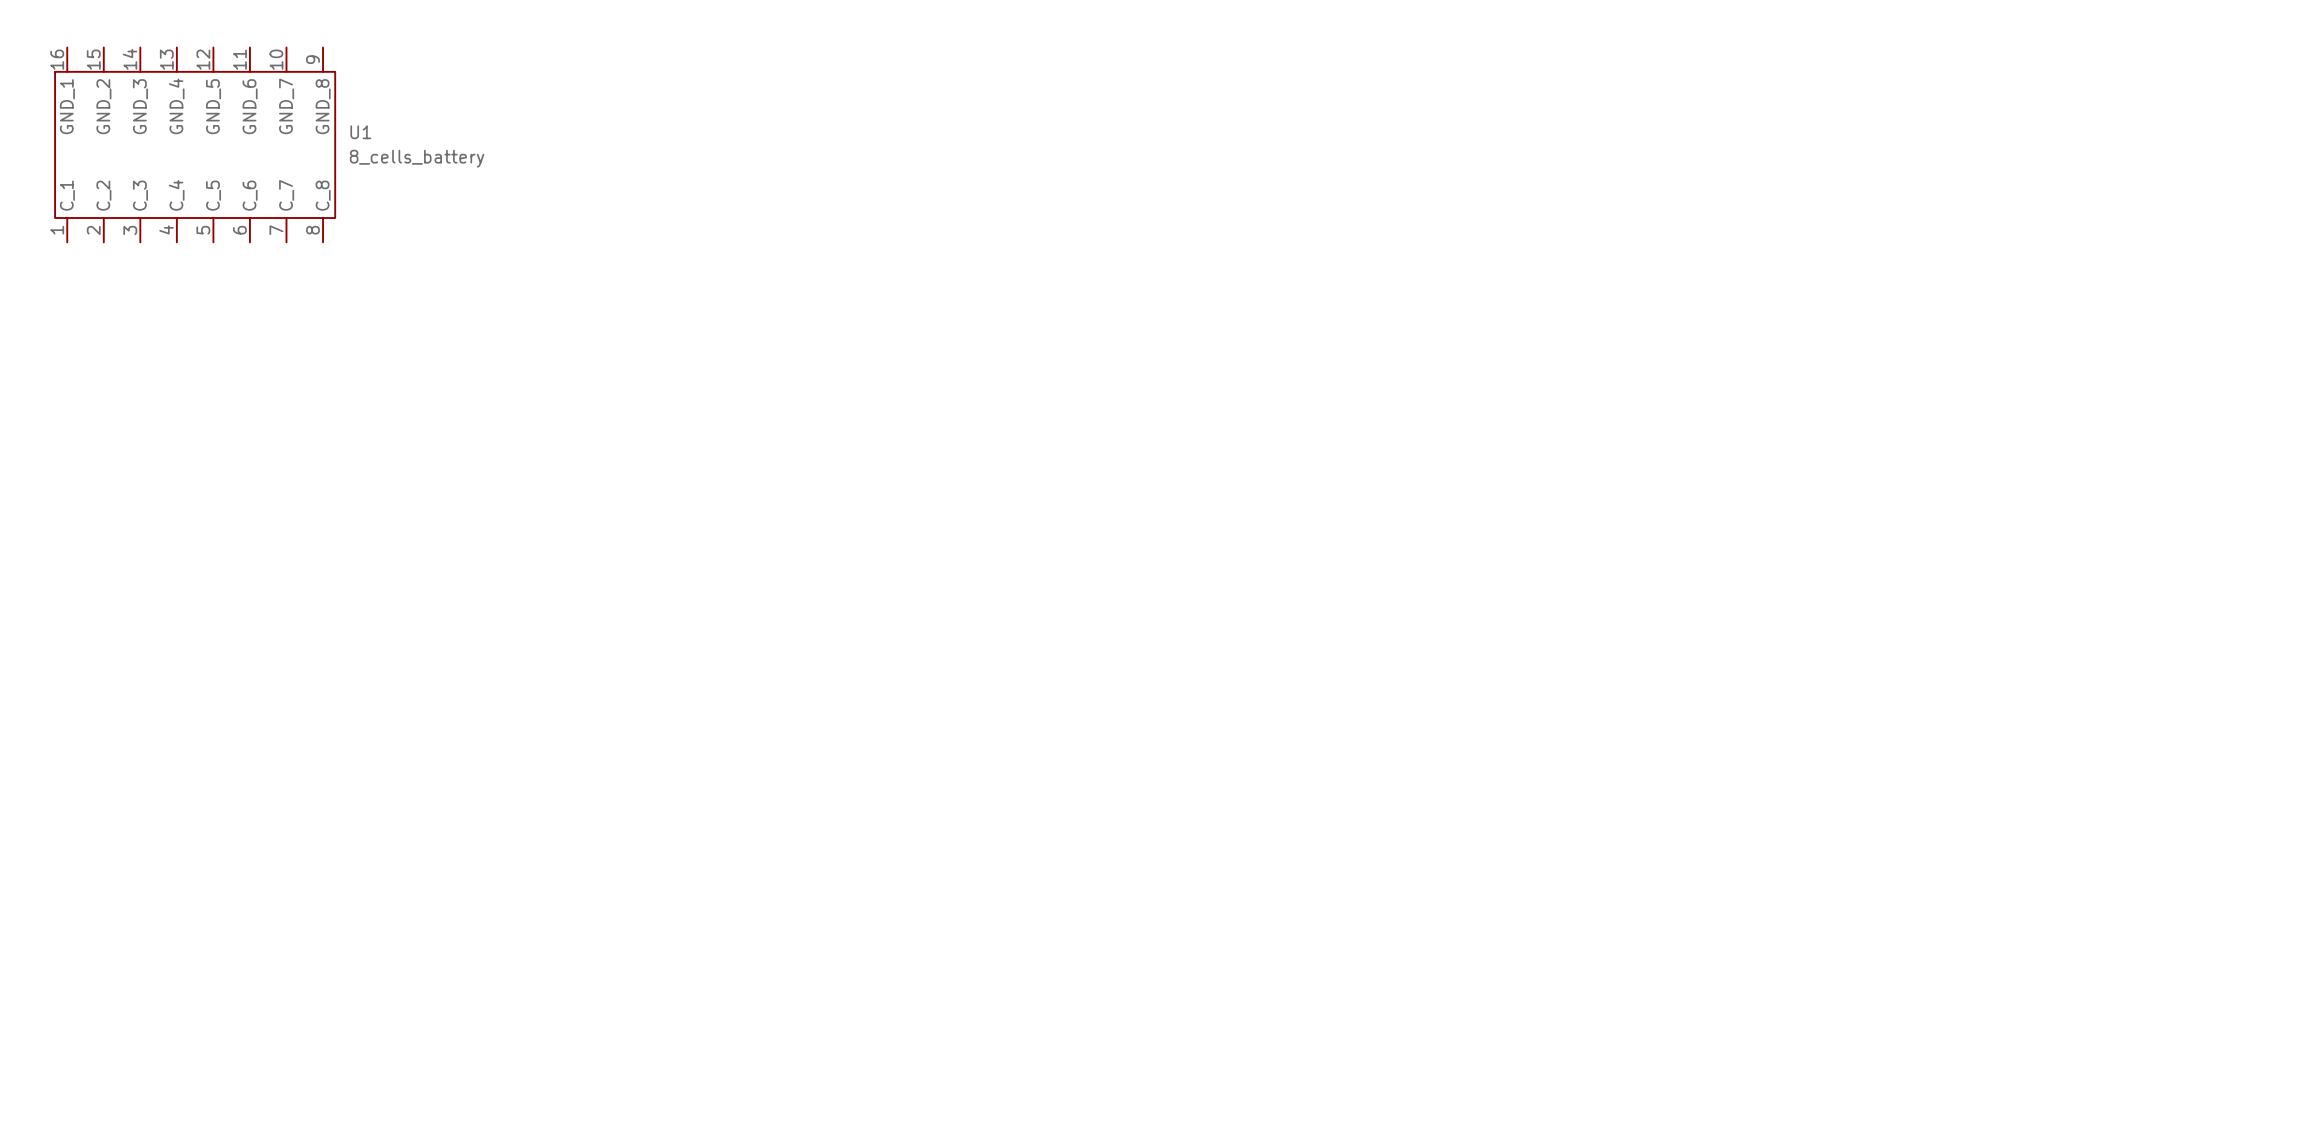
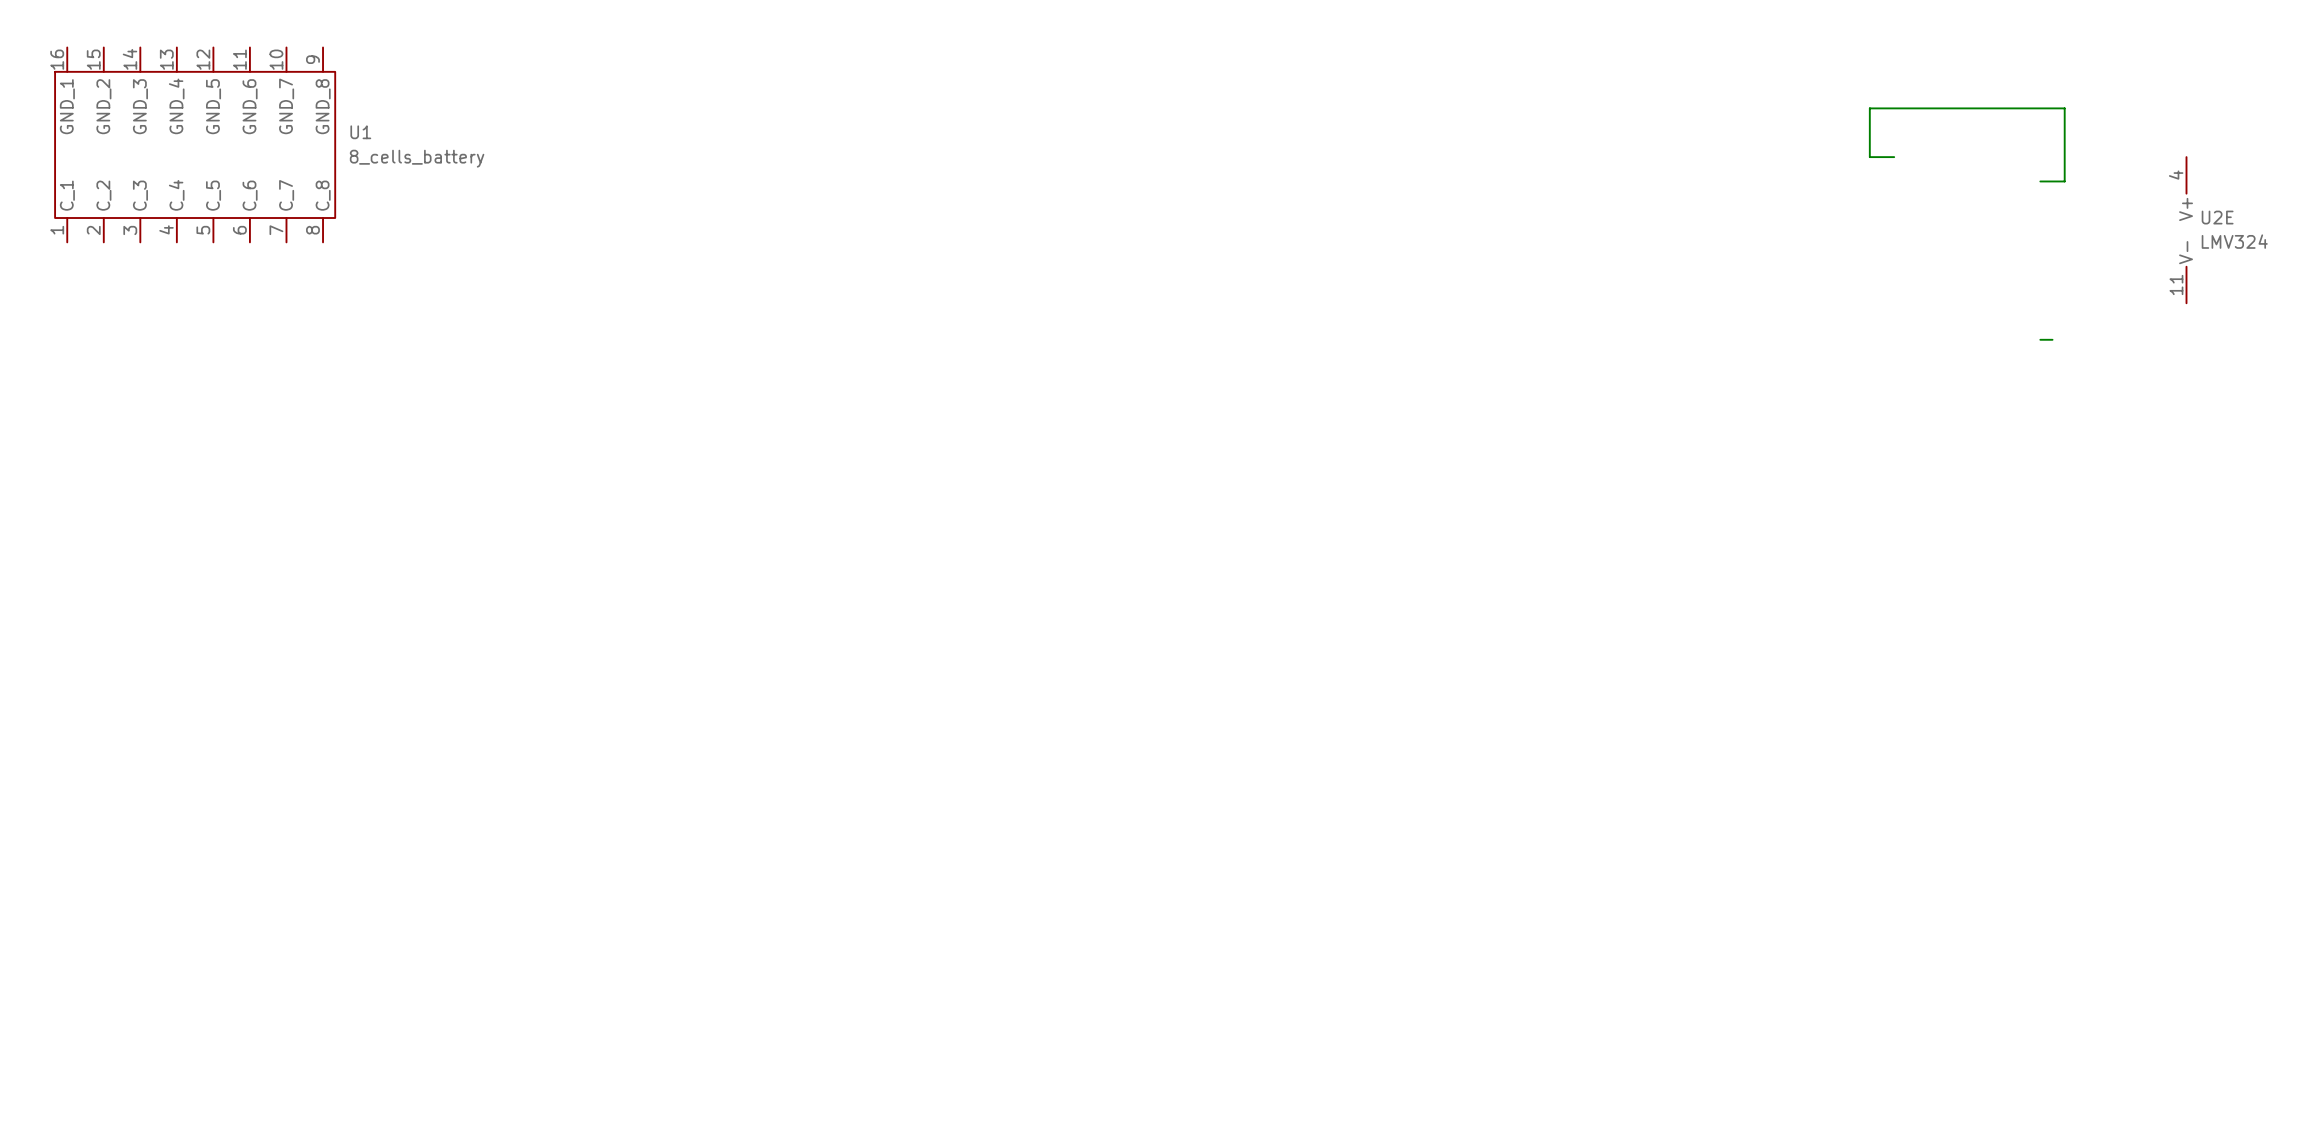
wire: none -> (1894, 157) (1869, 157) (1869, 108) (2064, 108) (2064, 181) (2040, 181)
U2E: none -> LMV324 (2186, 230)
wire: none -> (2040, 339) (2052, 339)

